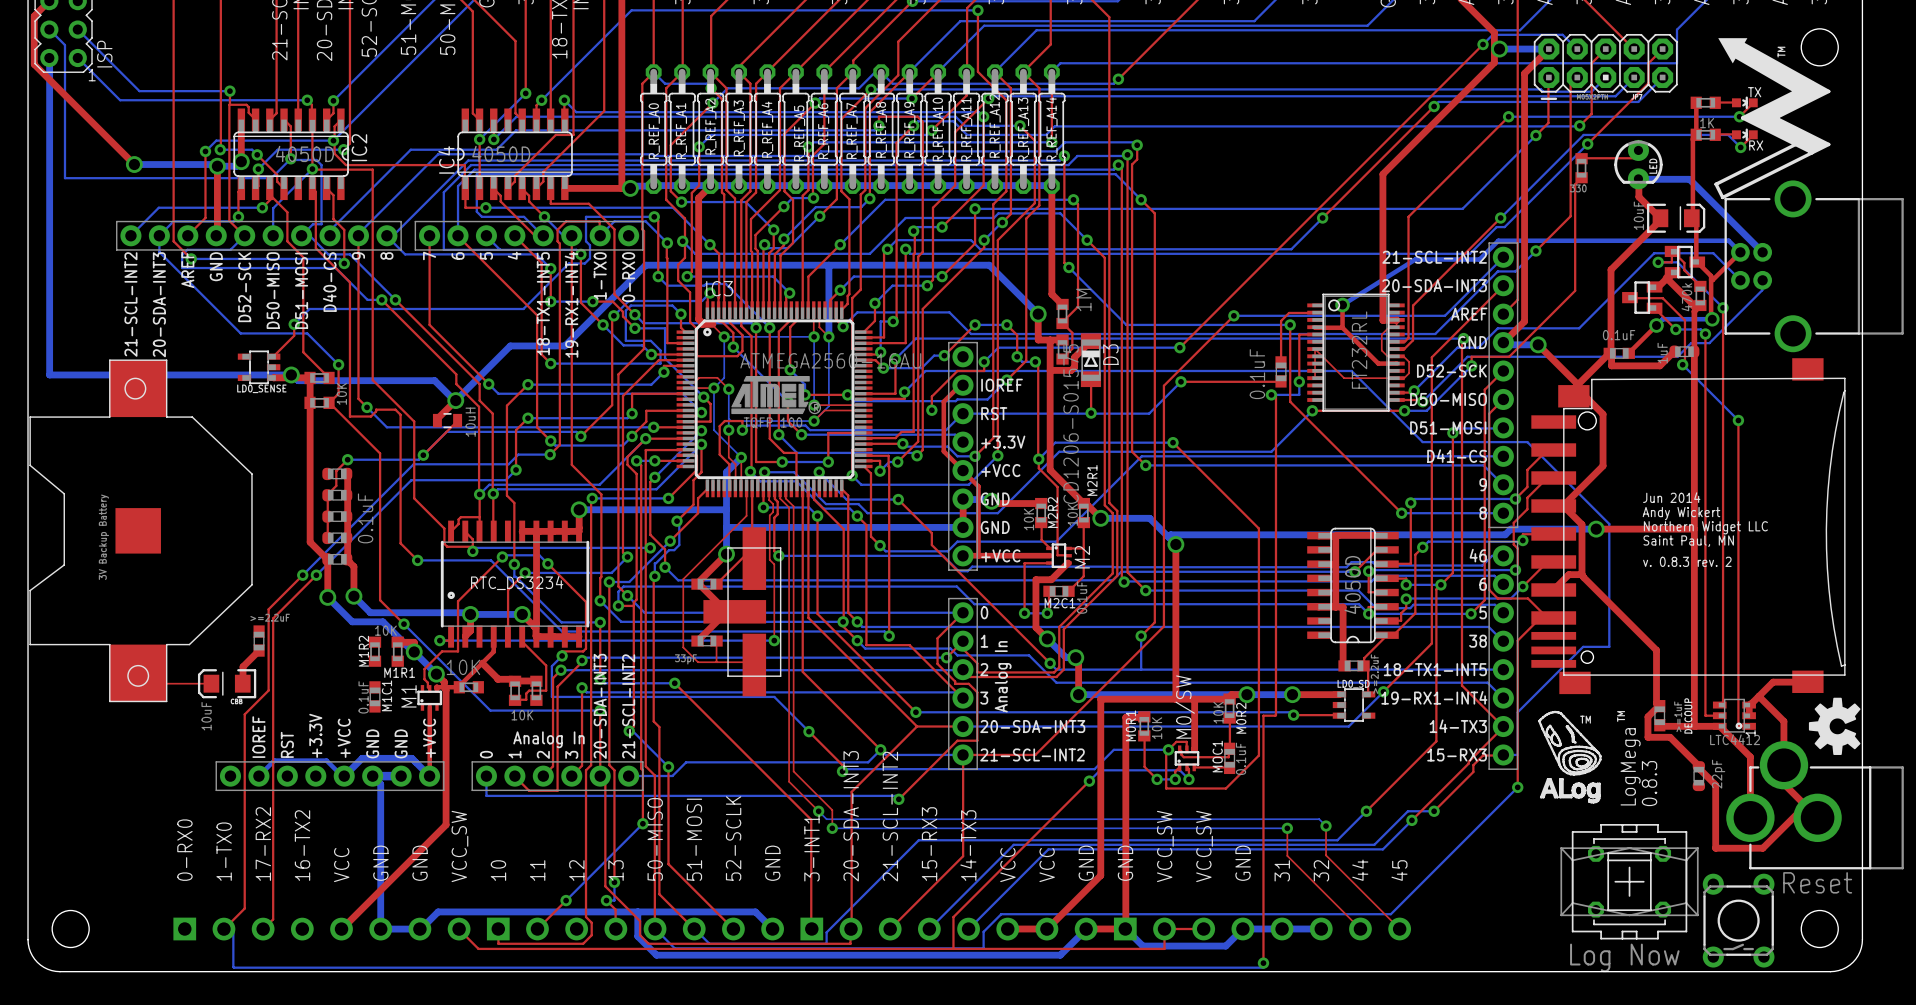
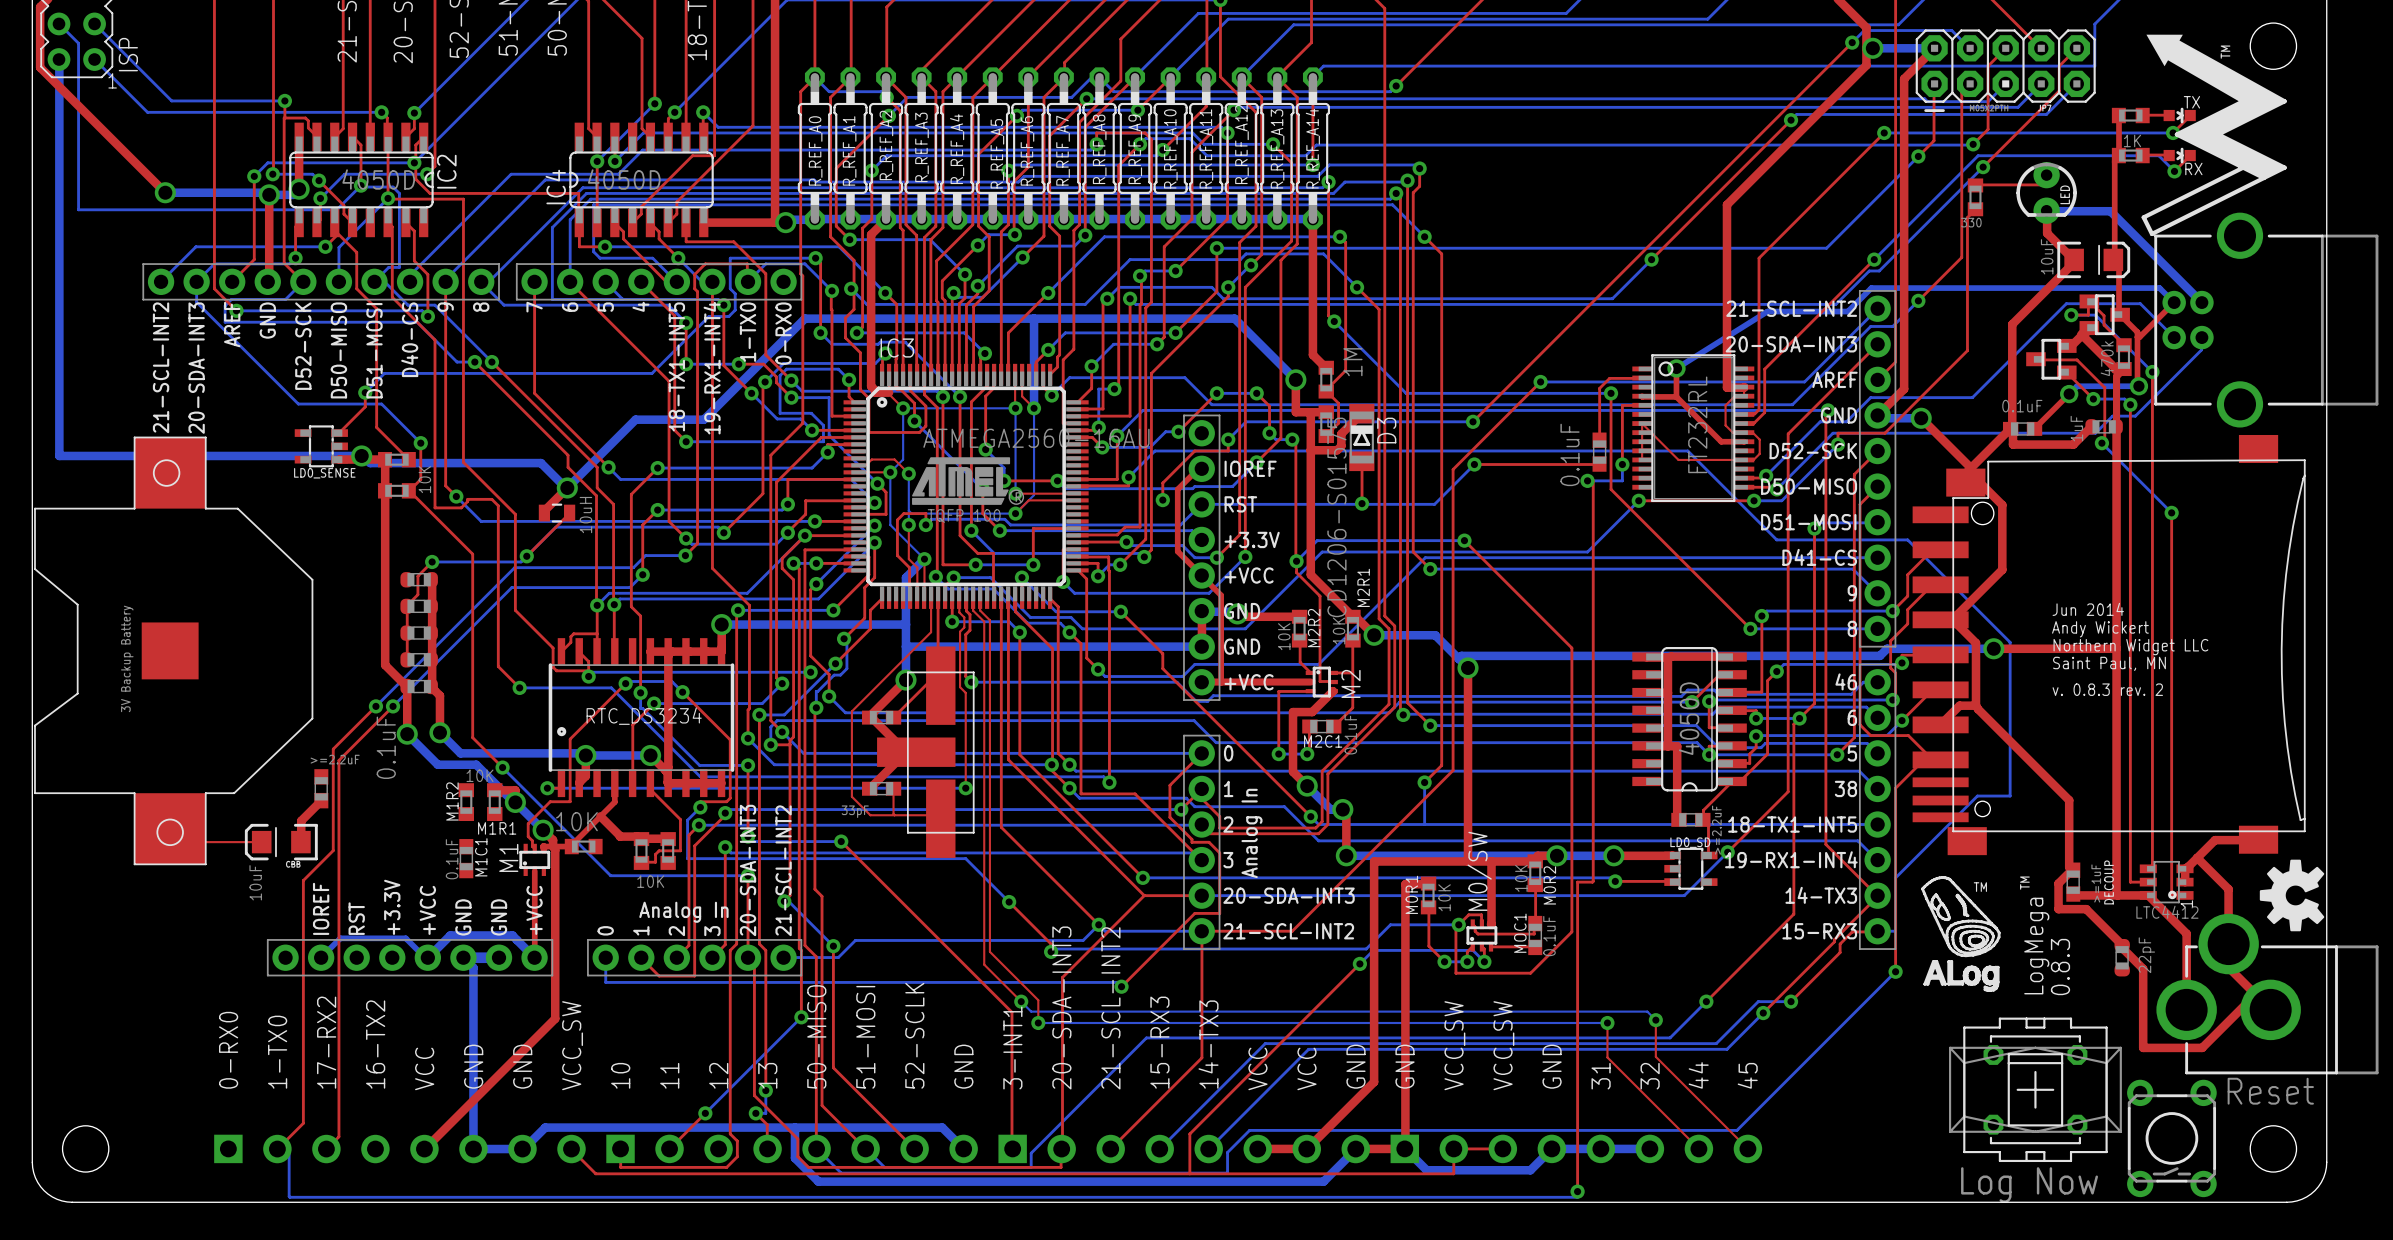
part value position: 0.1uF (365, 518) -> 0.1uF (386, 747)

